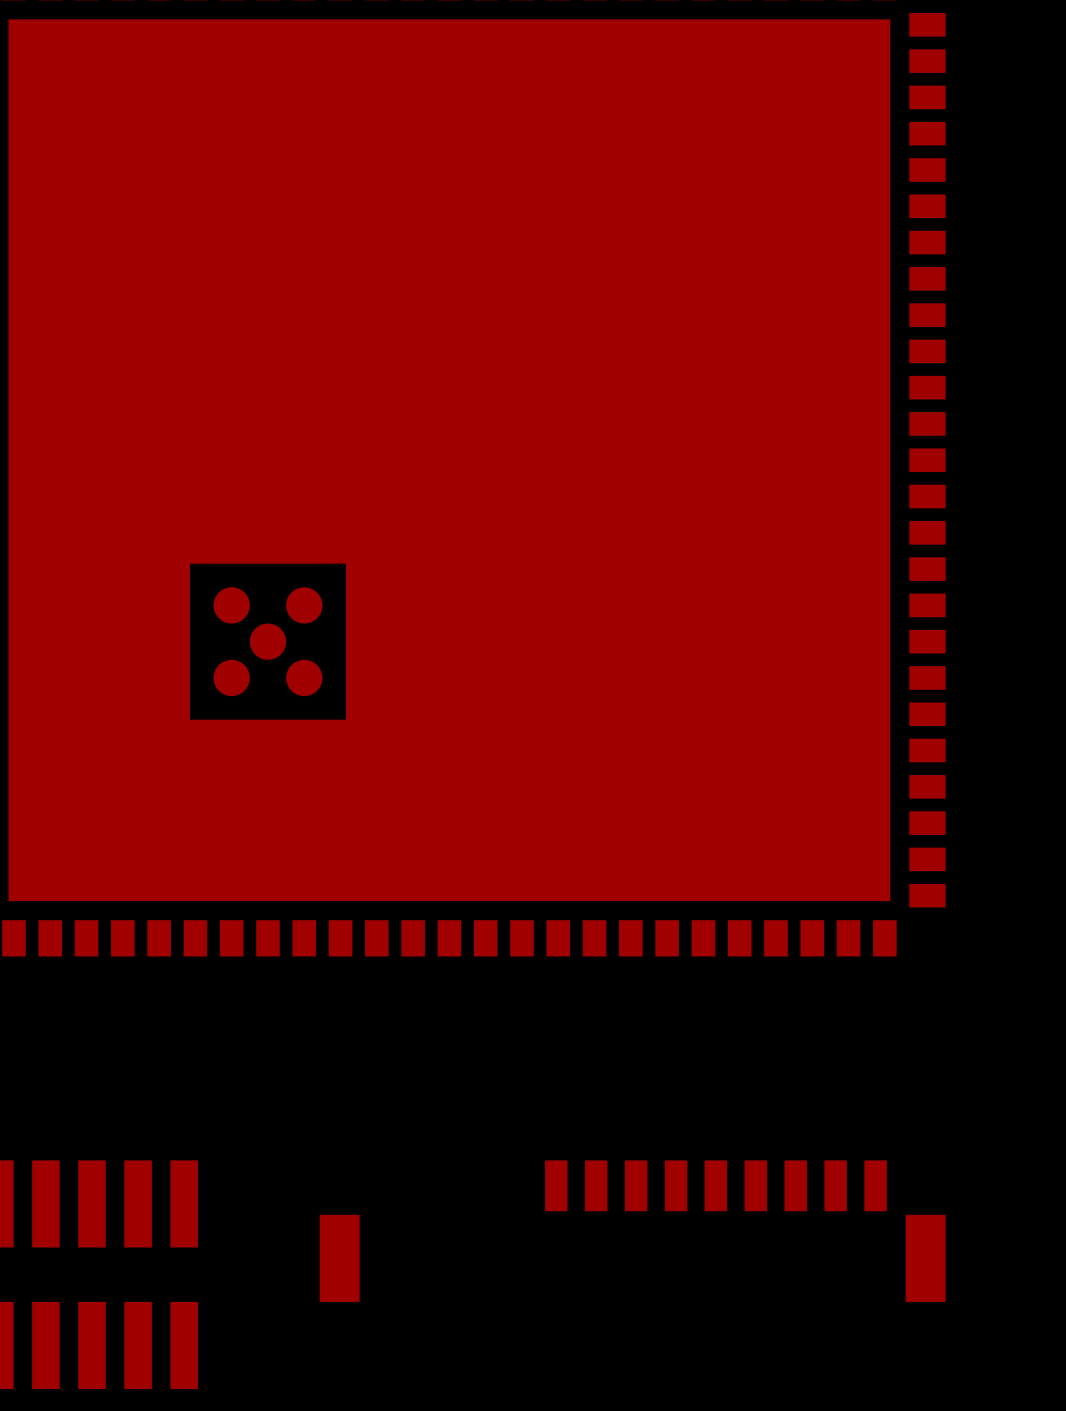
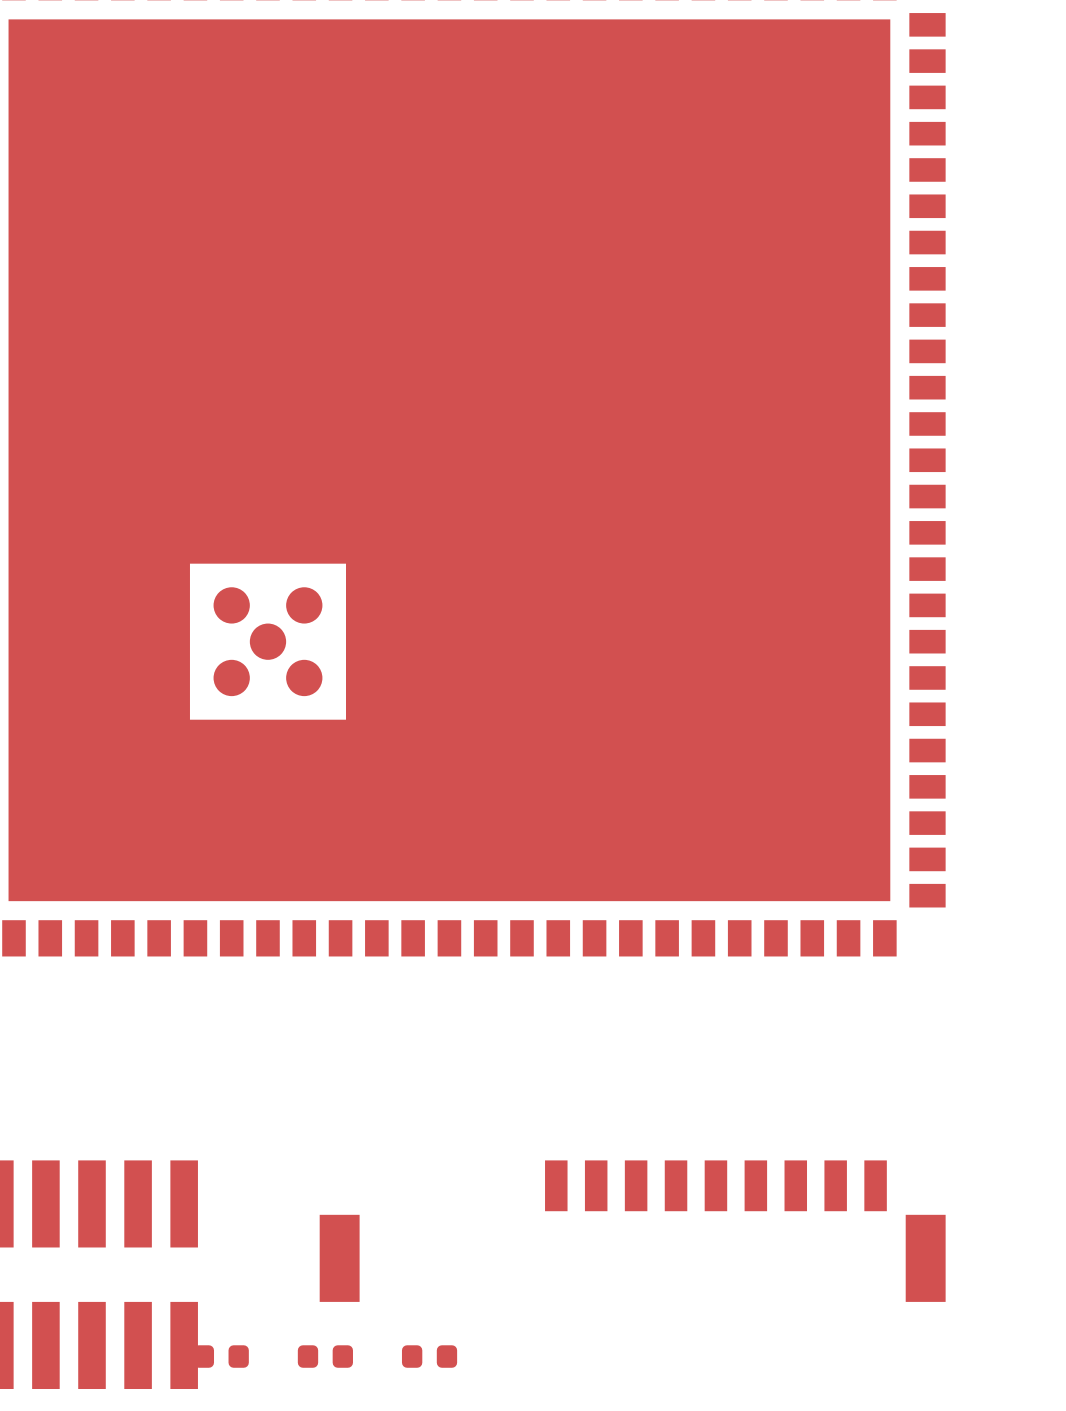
part: none -> (221, 1356)
part: none -> (325, 1356)
part: none -> (429, 1356)

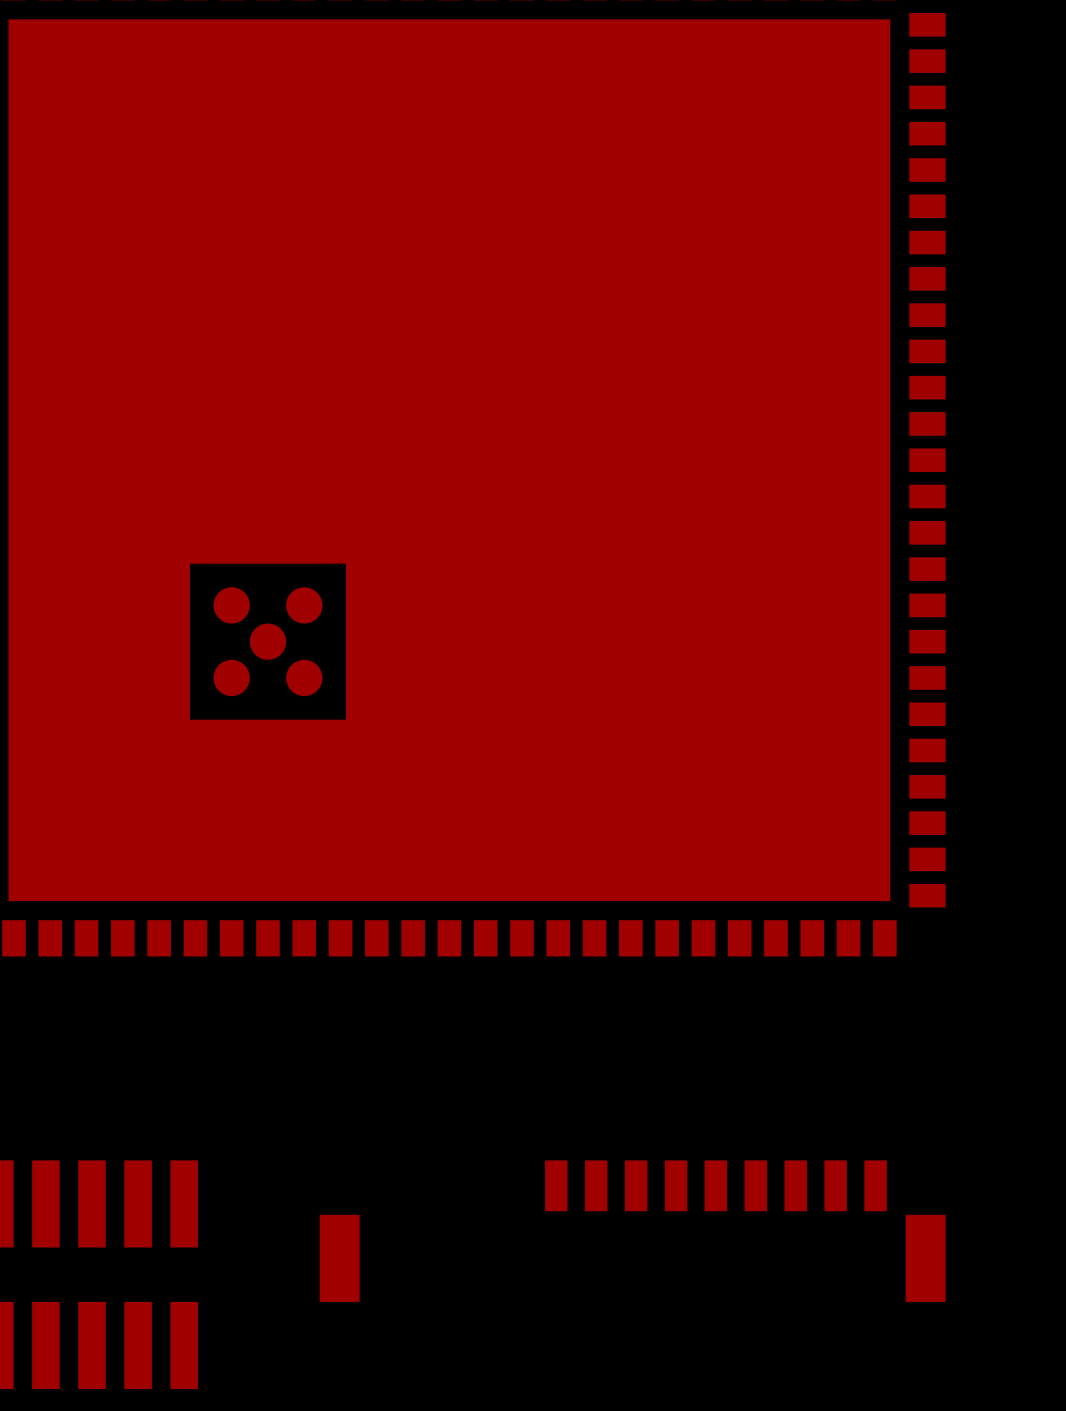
part: (221, 1356) -> none
part: (325, 1356) -> none
part: (429, 1356) -> none

